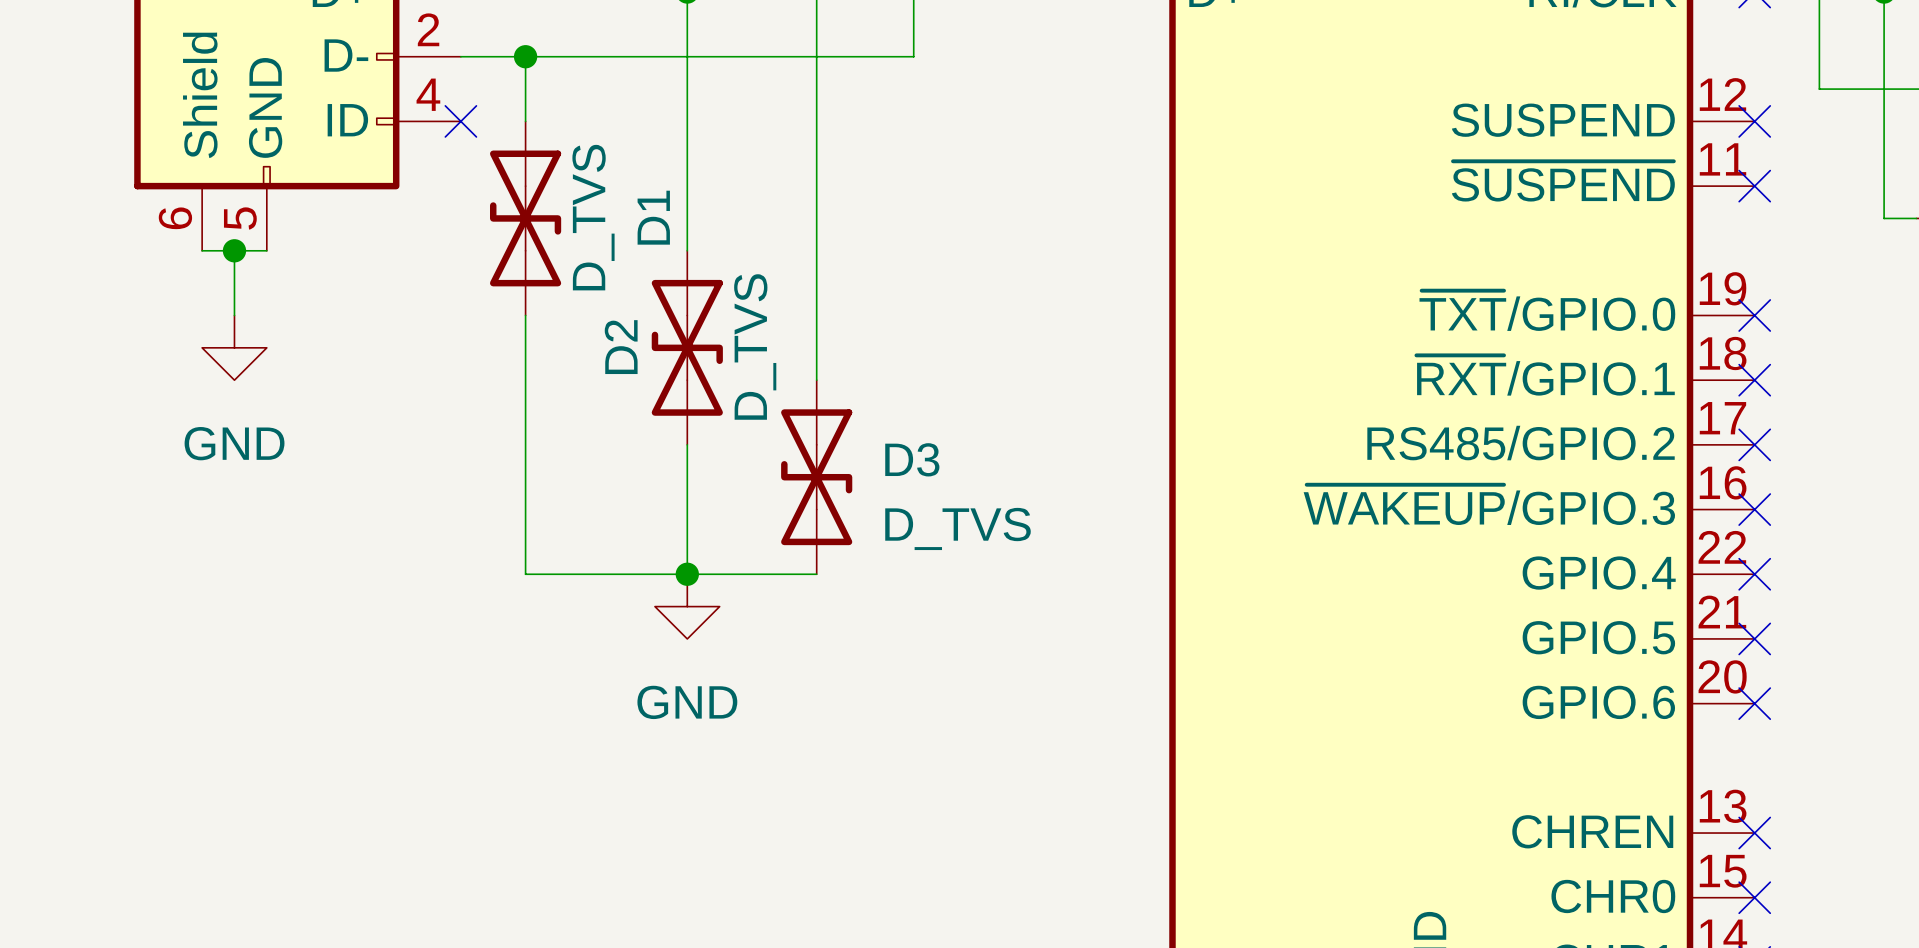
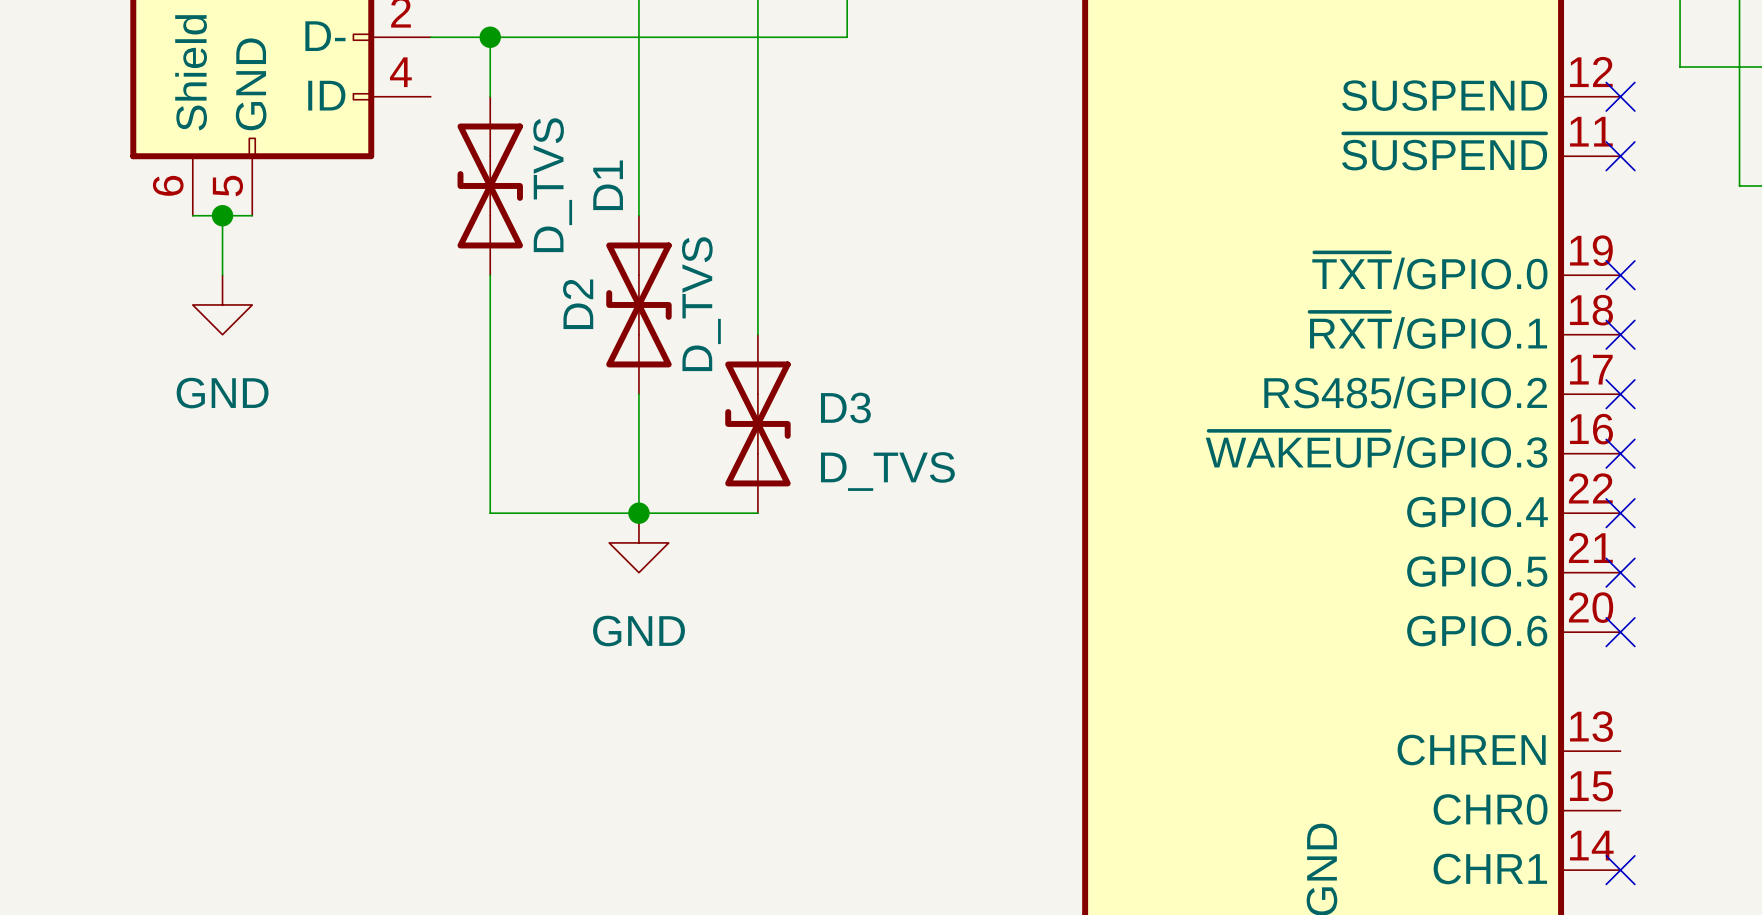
no-connect mark: (460, 121) -> none
no-connect mark: (1754, 833) -> none
no-connect mark: (1754, 897) -> none

